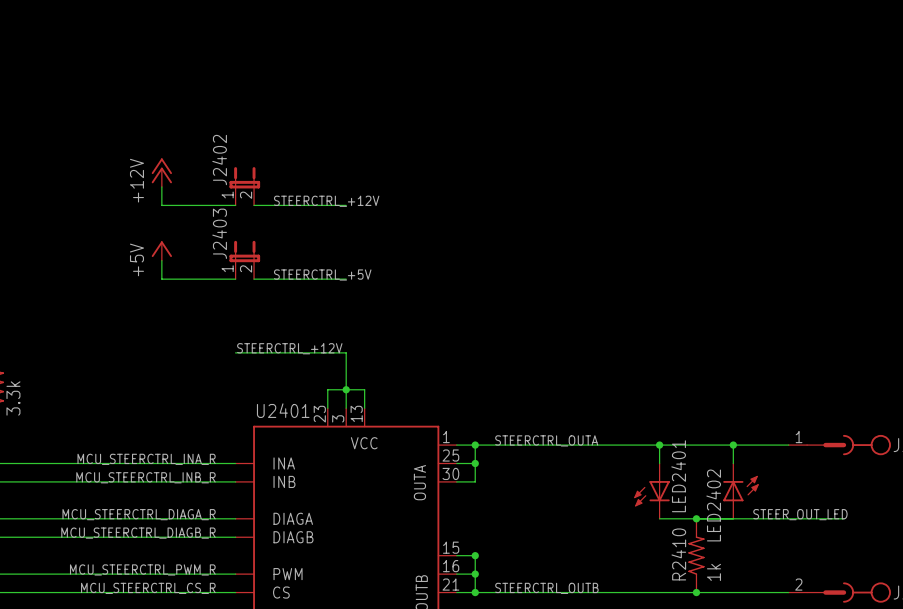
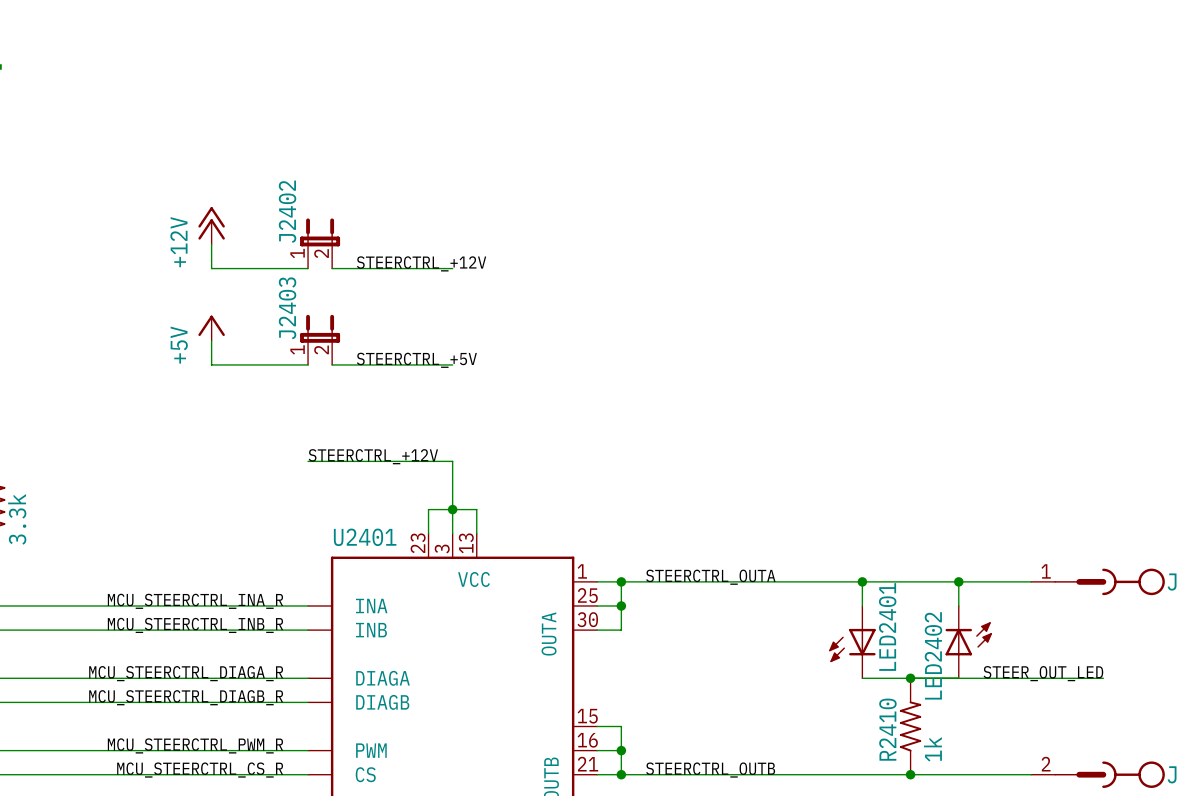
junction: (475, 555) -> none

